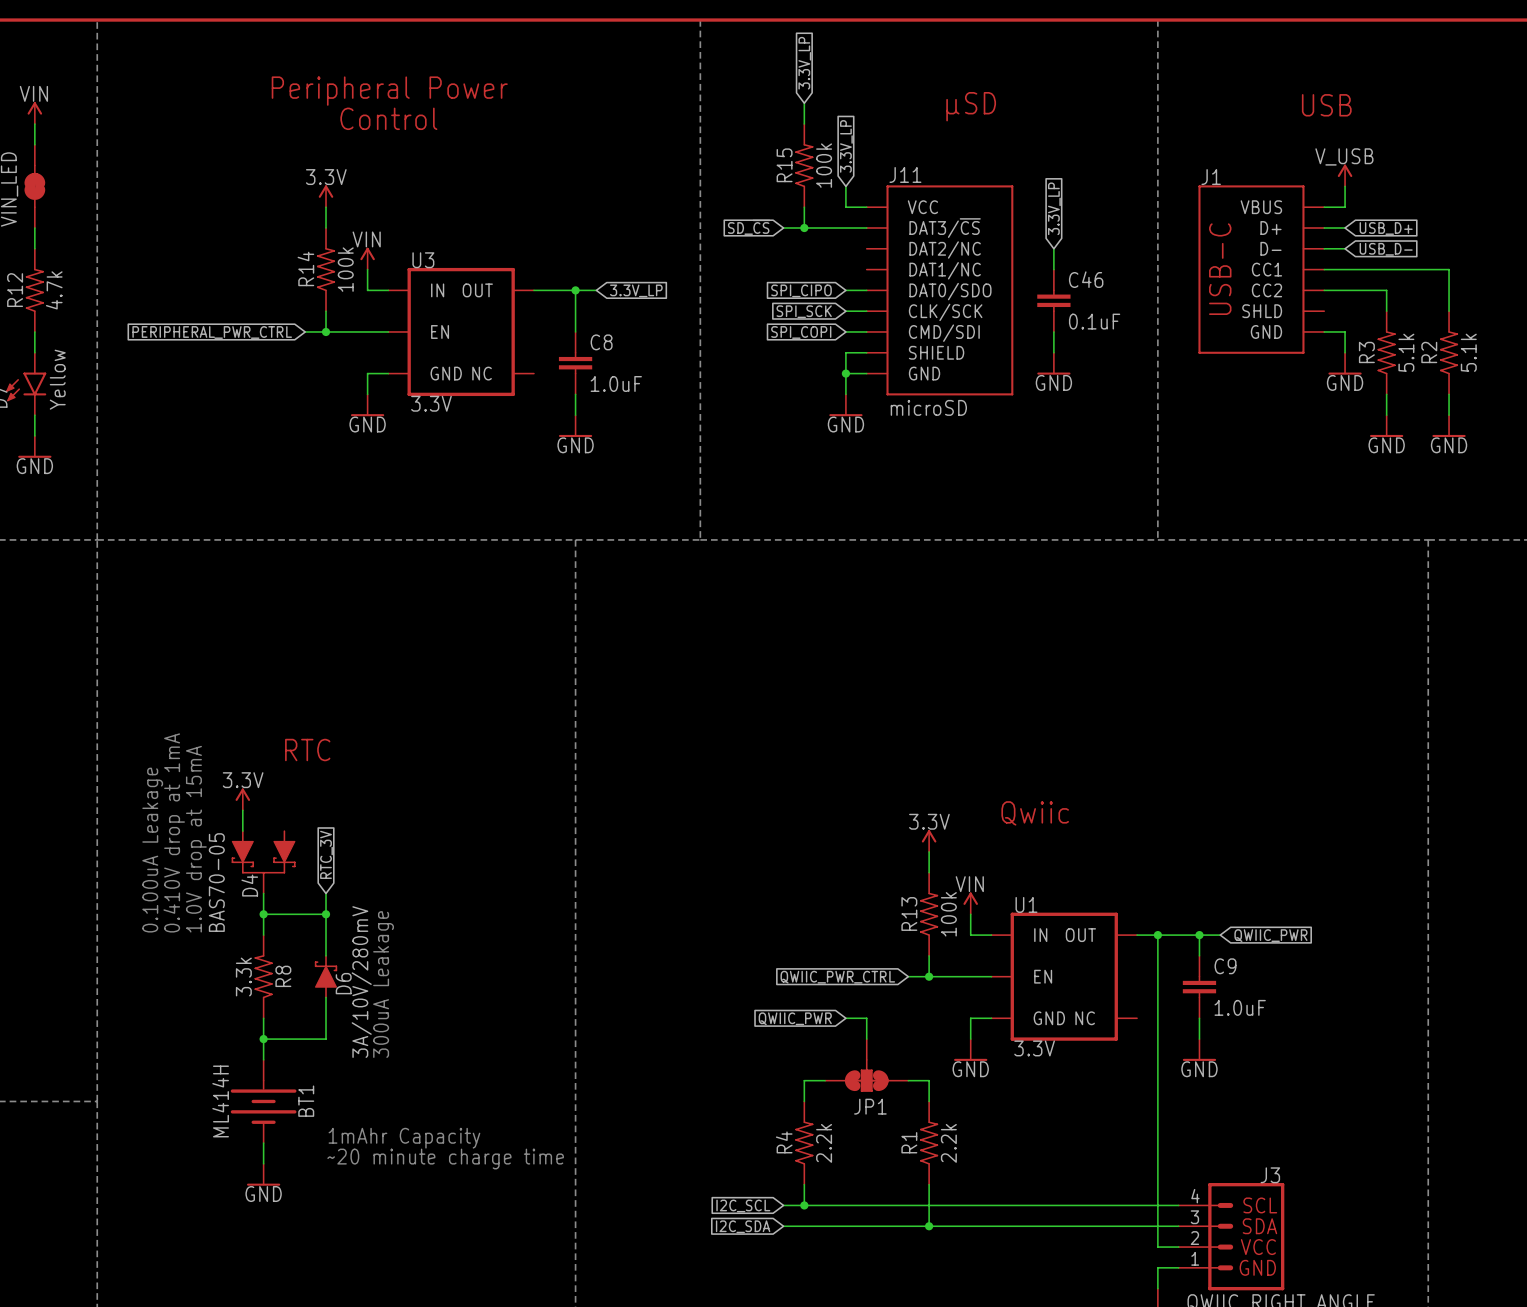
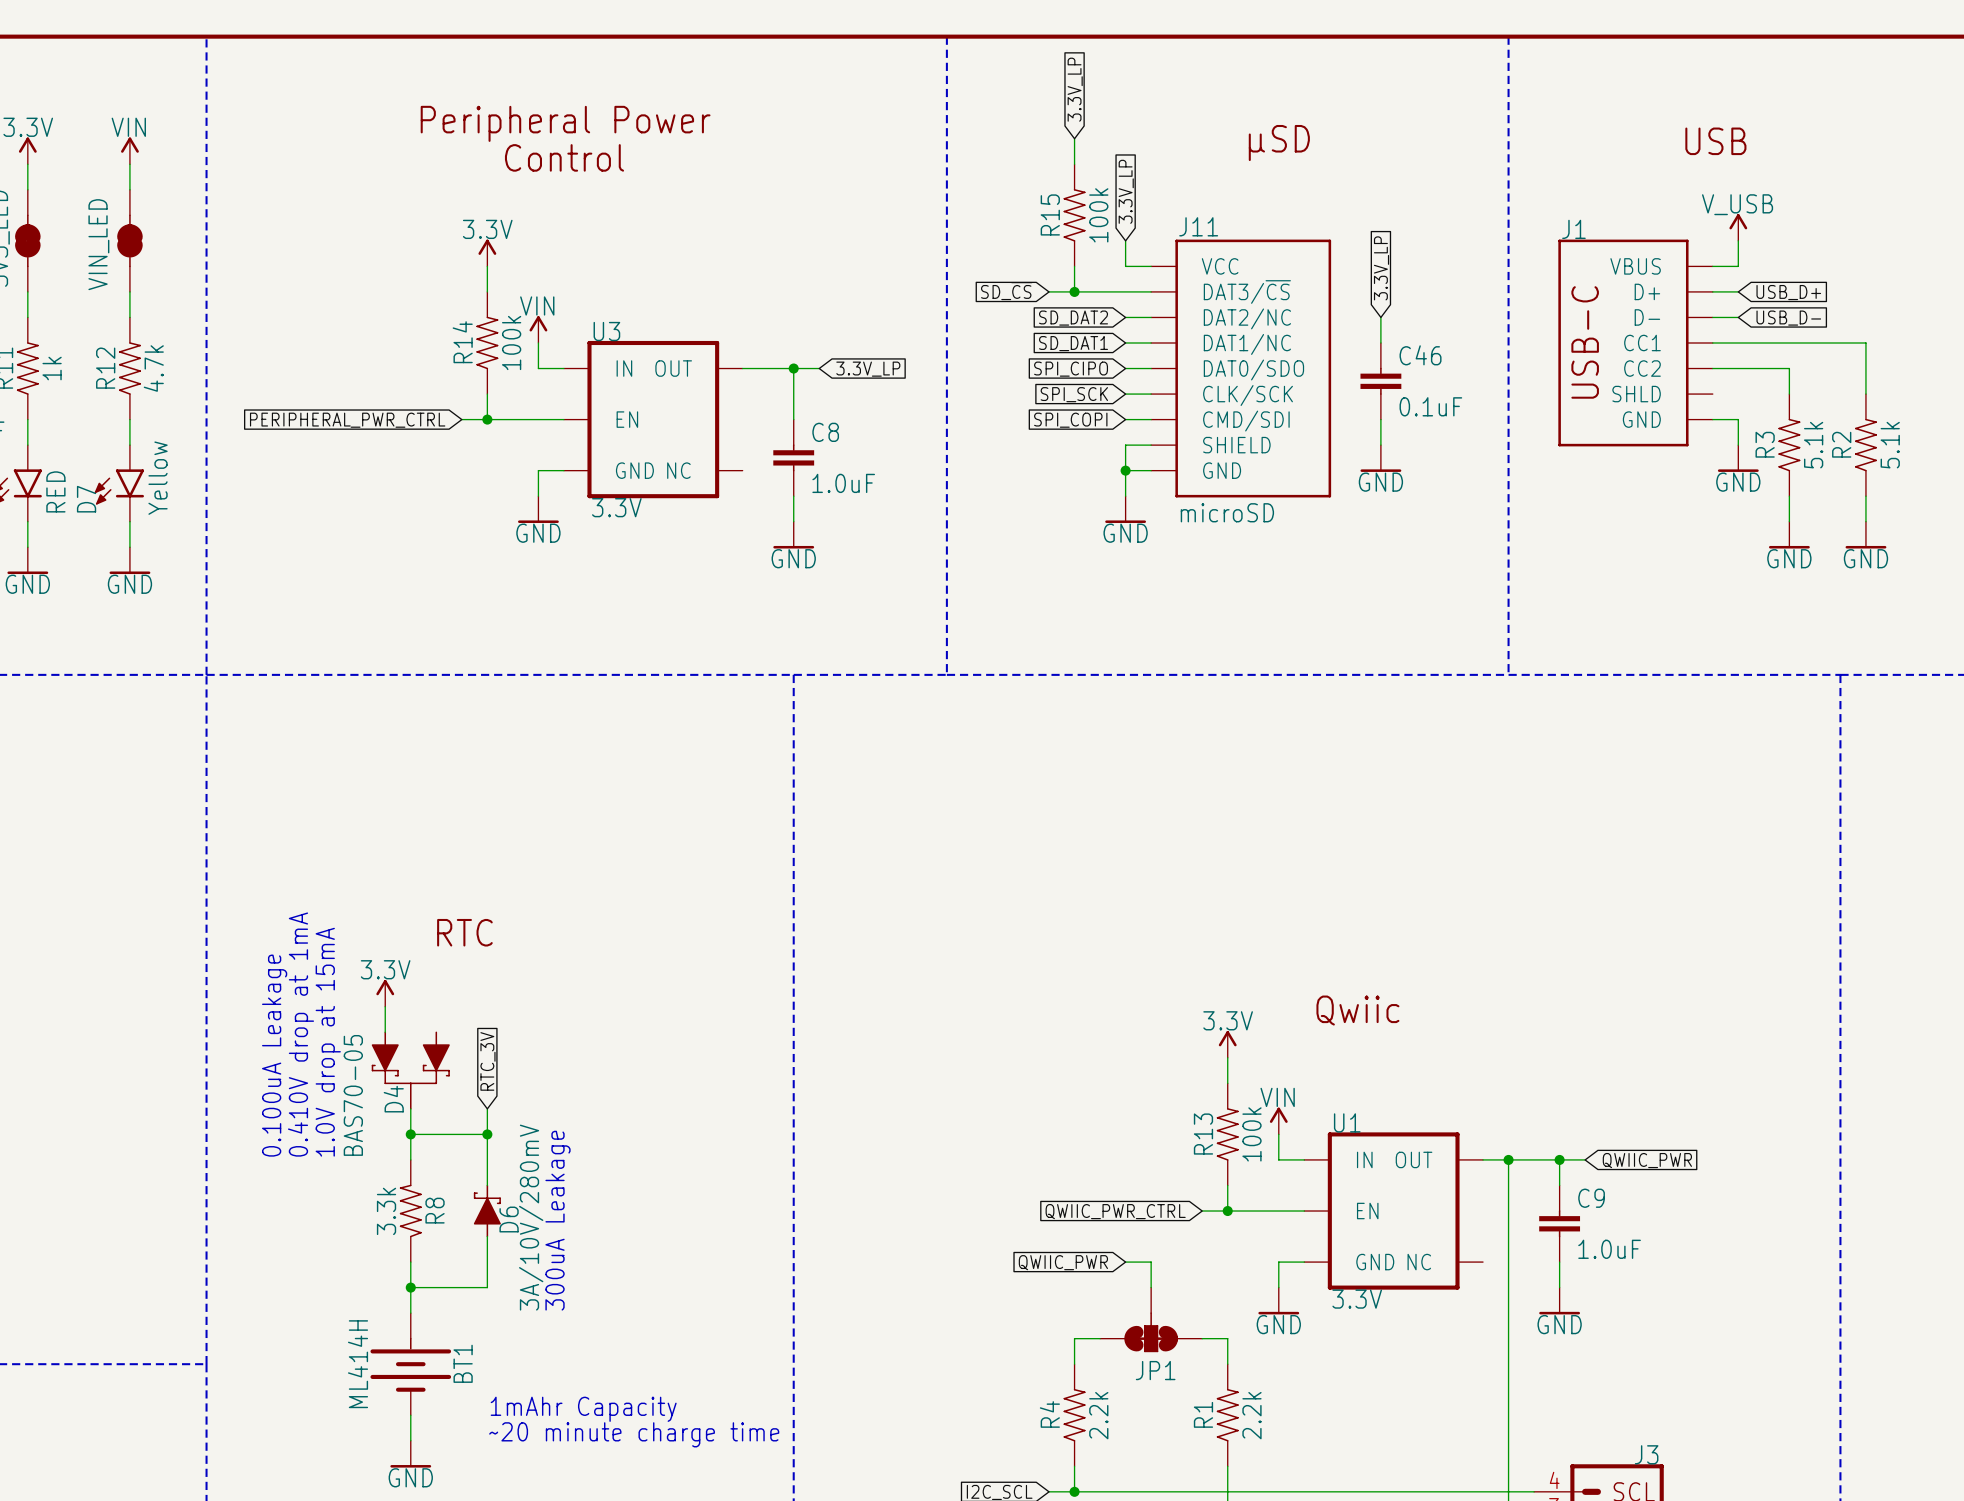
wire: none -> (1125, 317) (1151, 317)
global label: none -> SD_DAT2 (1073, 318)
wire: none -> (1125, 342) (1151, 342)
global label: none -> SD_DAT1 (1073, 343)

